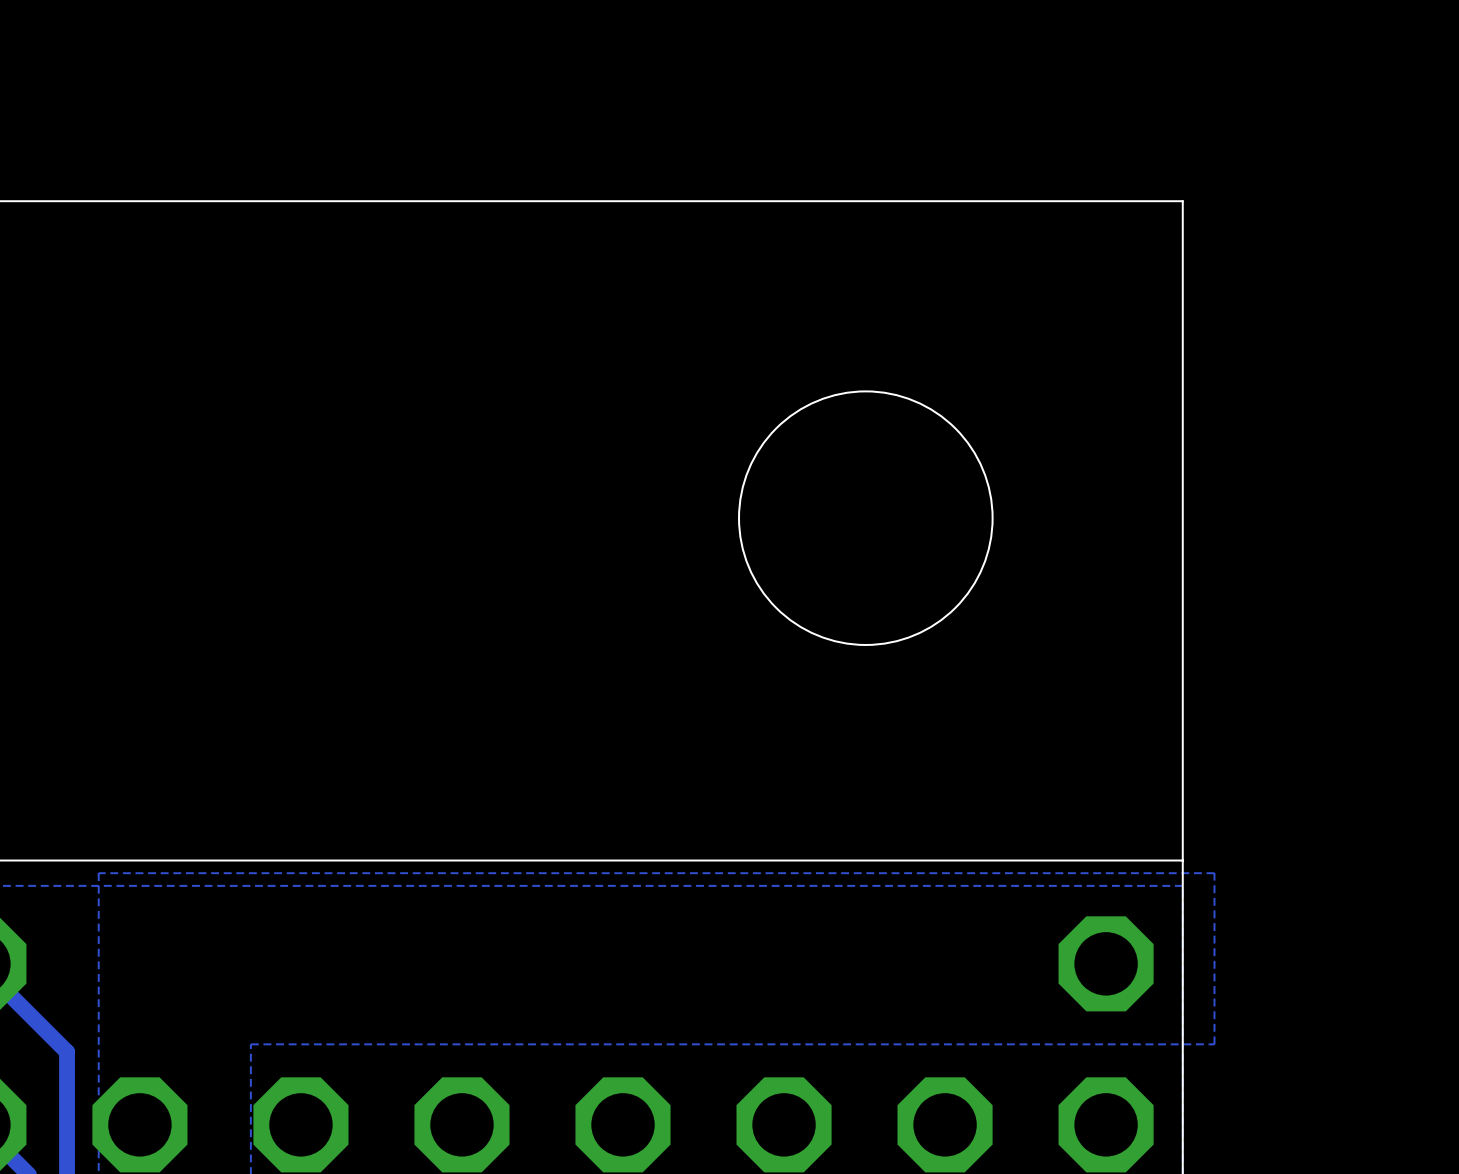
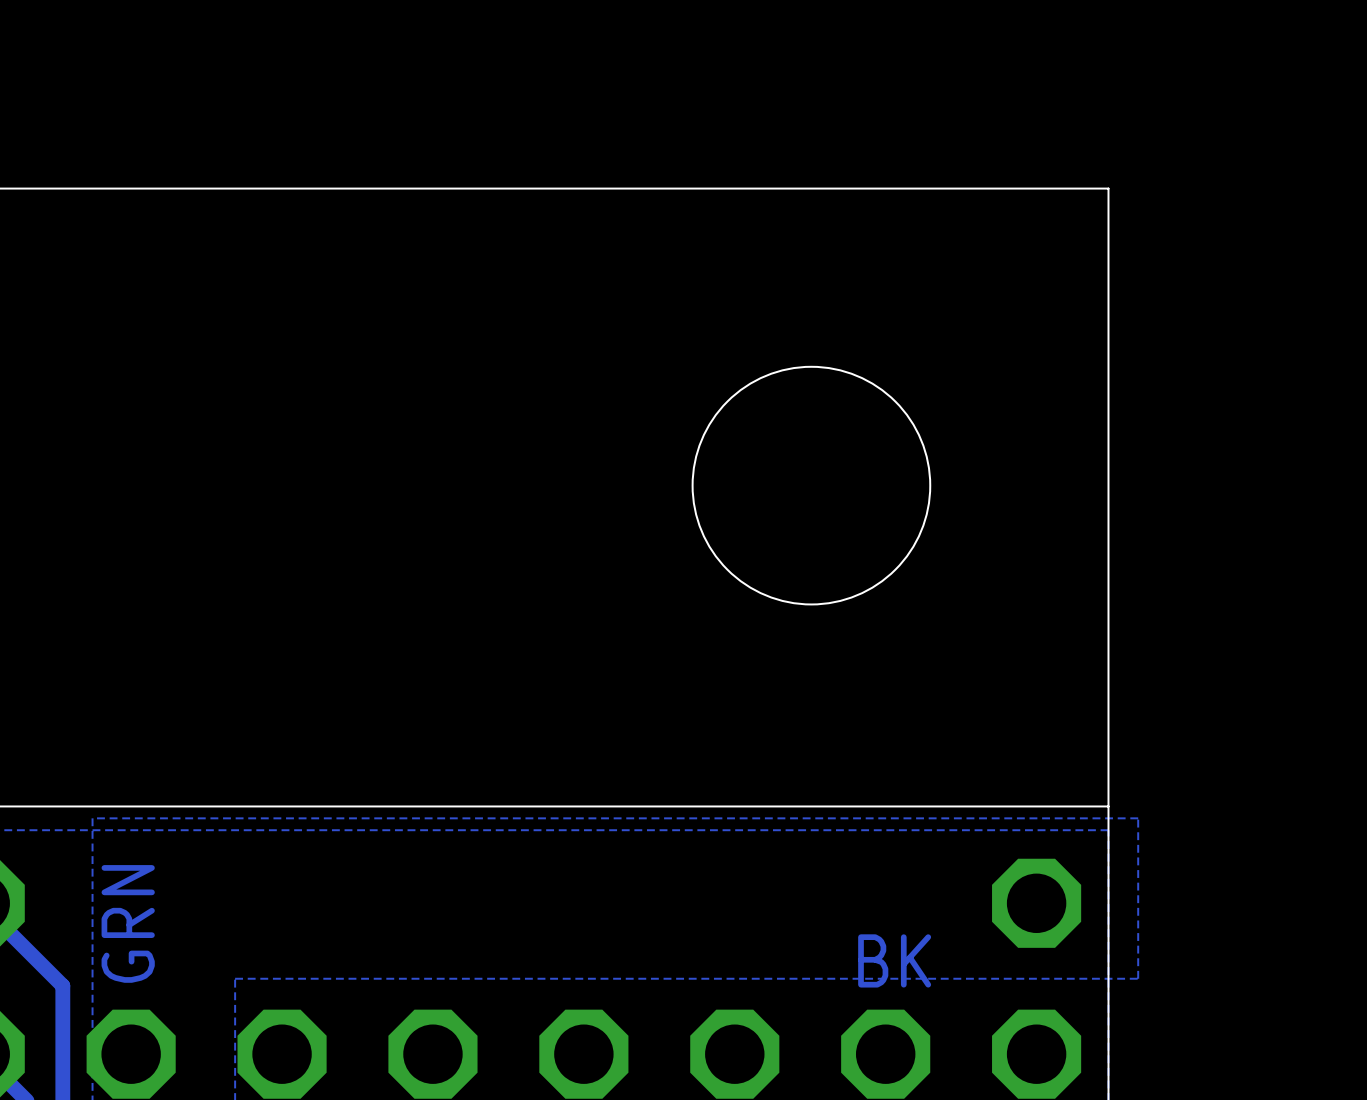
text: none -> GRN (128, 923)
text: none -> BK (894, 960)

